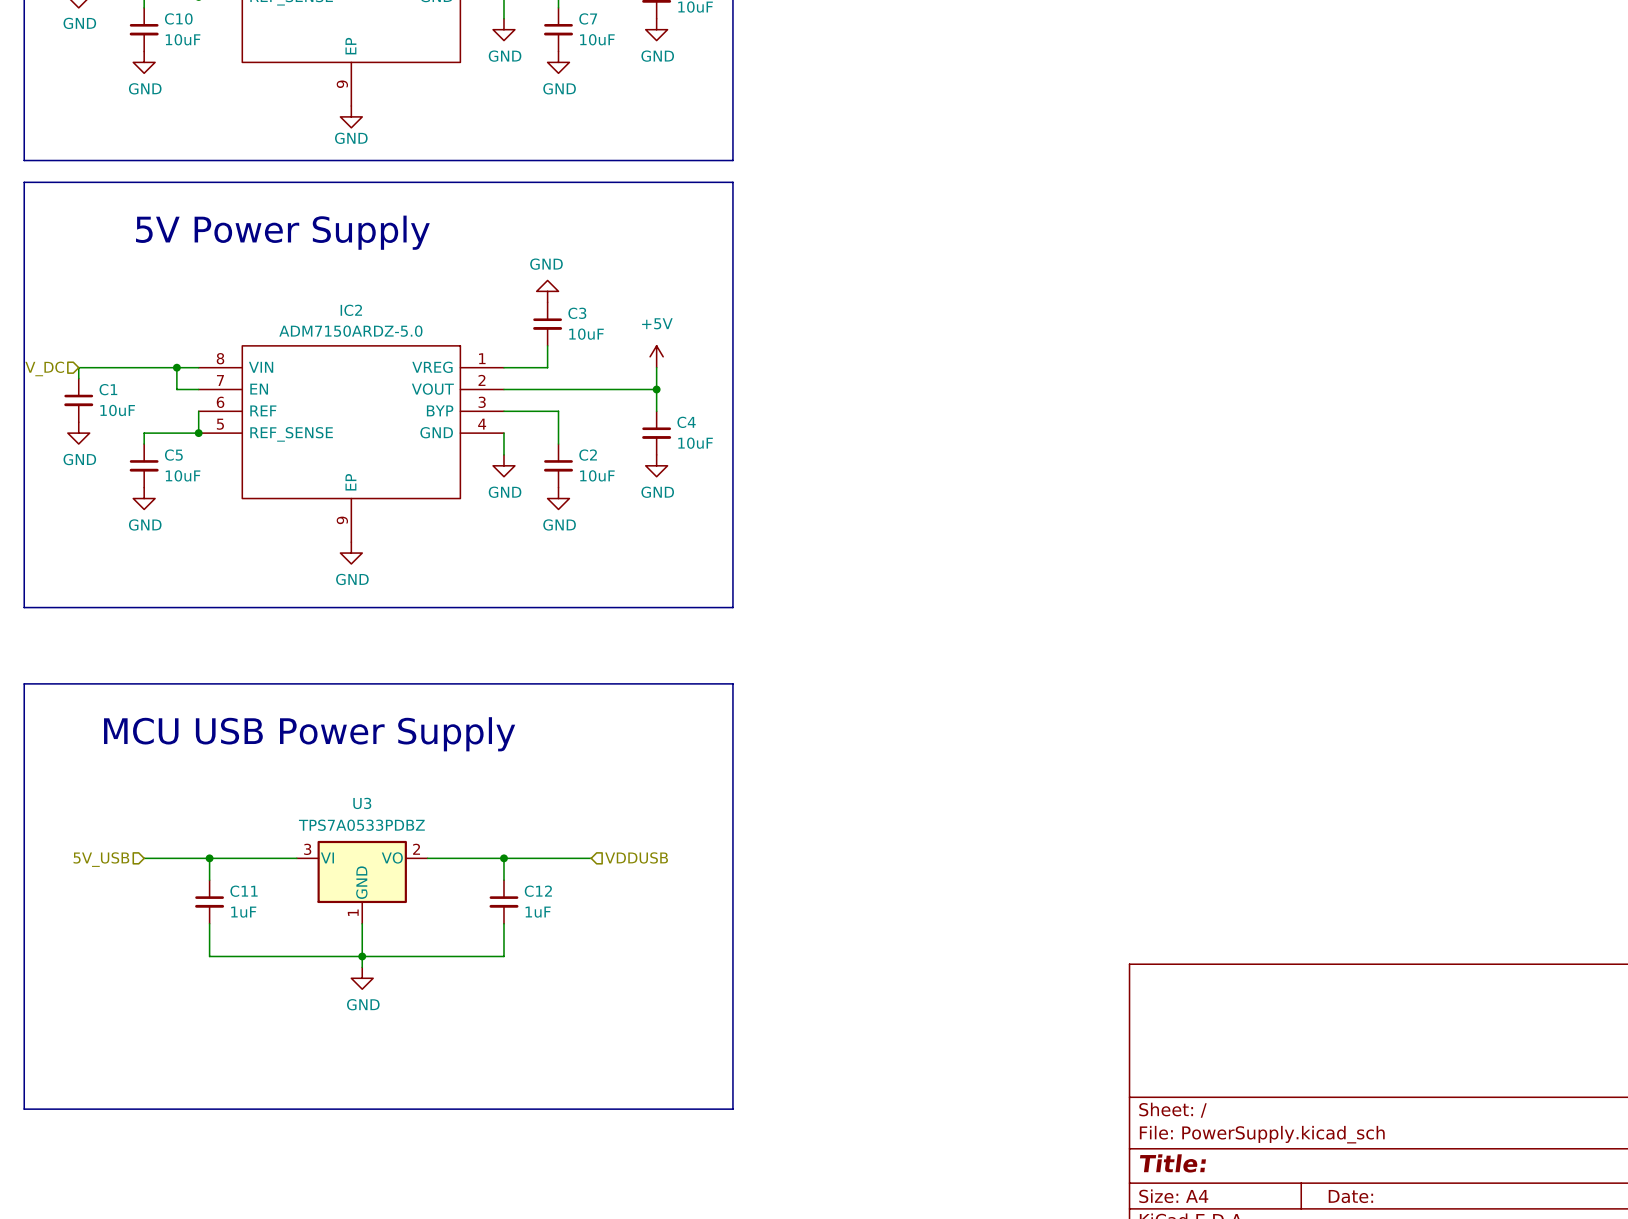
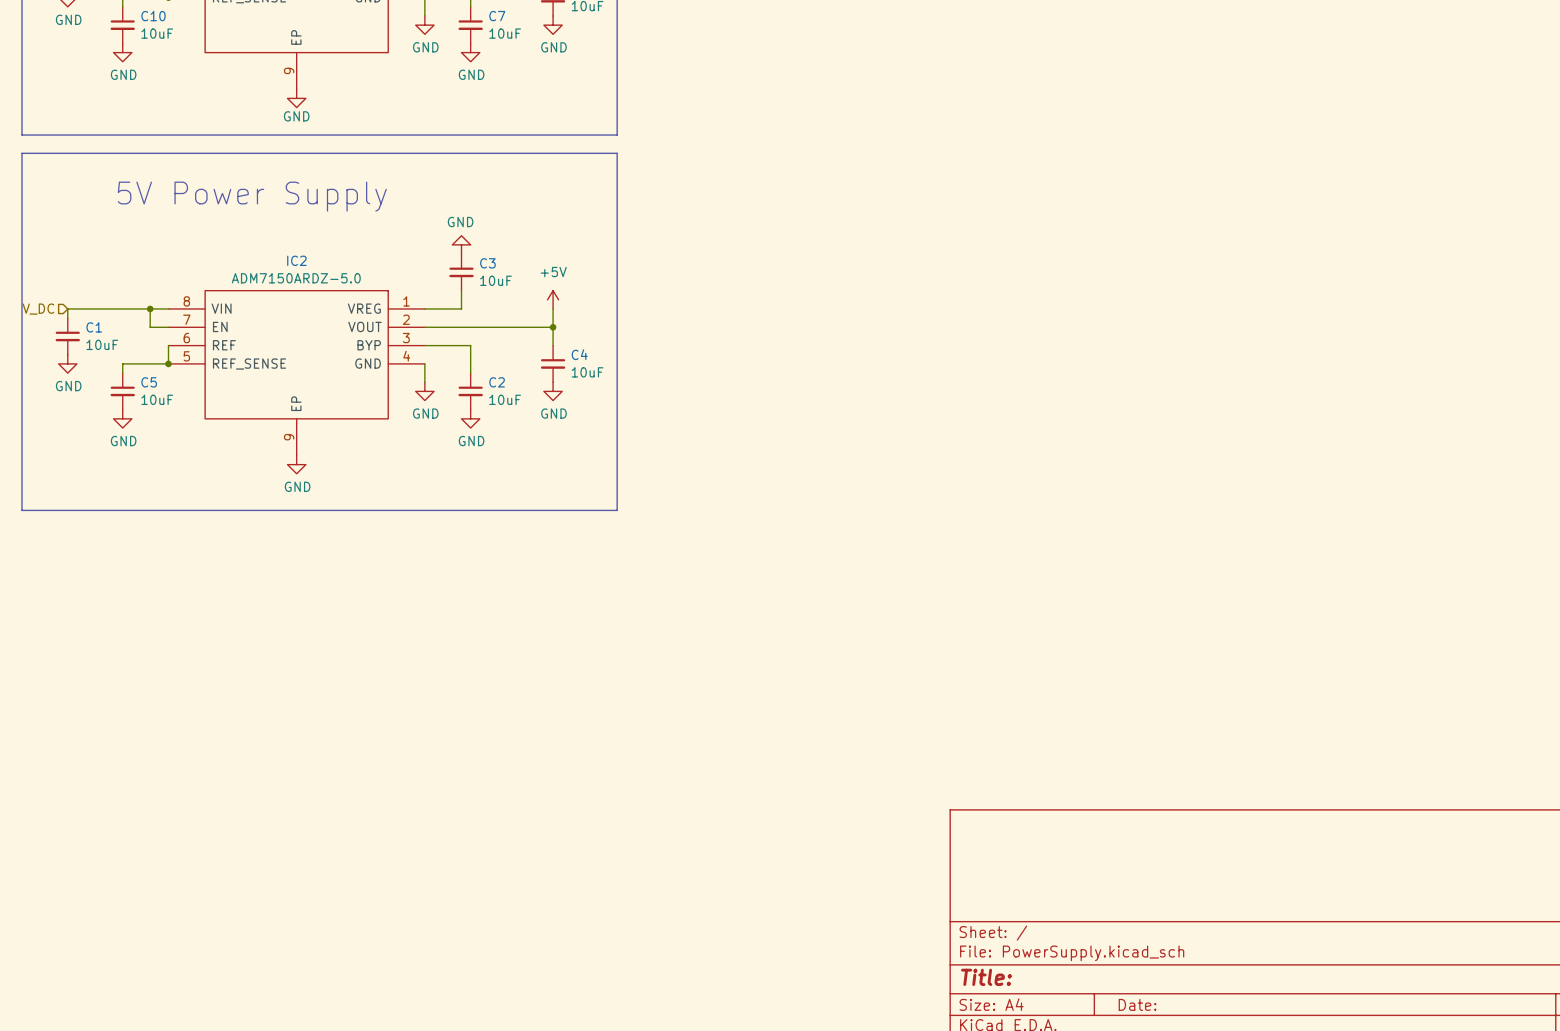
line: (24, 683) (732, 683) (732, 1109) (24, 1109) (24, 683) -> none
text: MCU USB Power Supply (309, 734) -> none
hierarchical label: VDDUSB (636, 857) -> none
wire: (144, 858) (296, 858) -> none
wire: (209, 858) (209, 880) -> none
junction: (209, 858) -> none
wire: (427, 858) (591, 858) -> none
wire: (503, 858) (503, 880) -> none
junction: (503, 858) -> none
hierarchical label: 5V_USB (101, 859) -> none
U3: TPS7A0533PDBZ (362, 882) -> none
C11: 1uF (209, 901) -> none
C12: 1uF (503, 901) -> none
wire: (209, 923) (209, 956) (503, 956) (503, 923) -> none
wire: (362, 923) (362, 967) -> none
junction: (362, 956) -> none
power symbol: GND (362, 978) -> none

